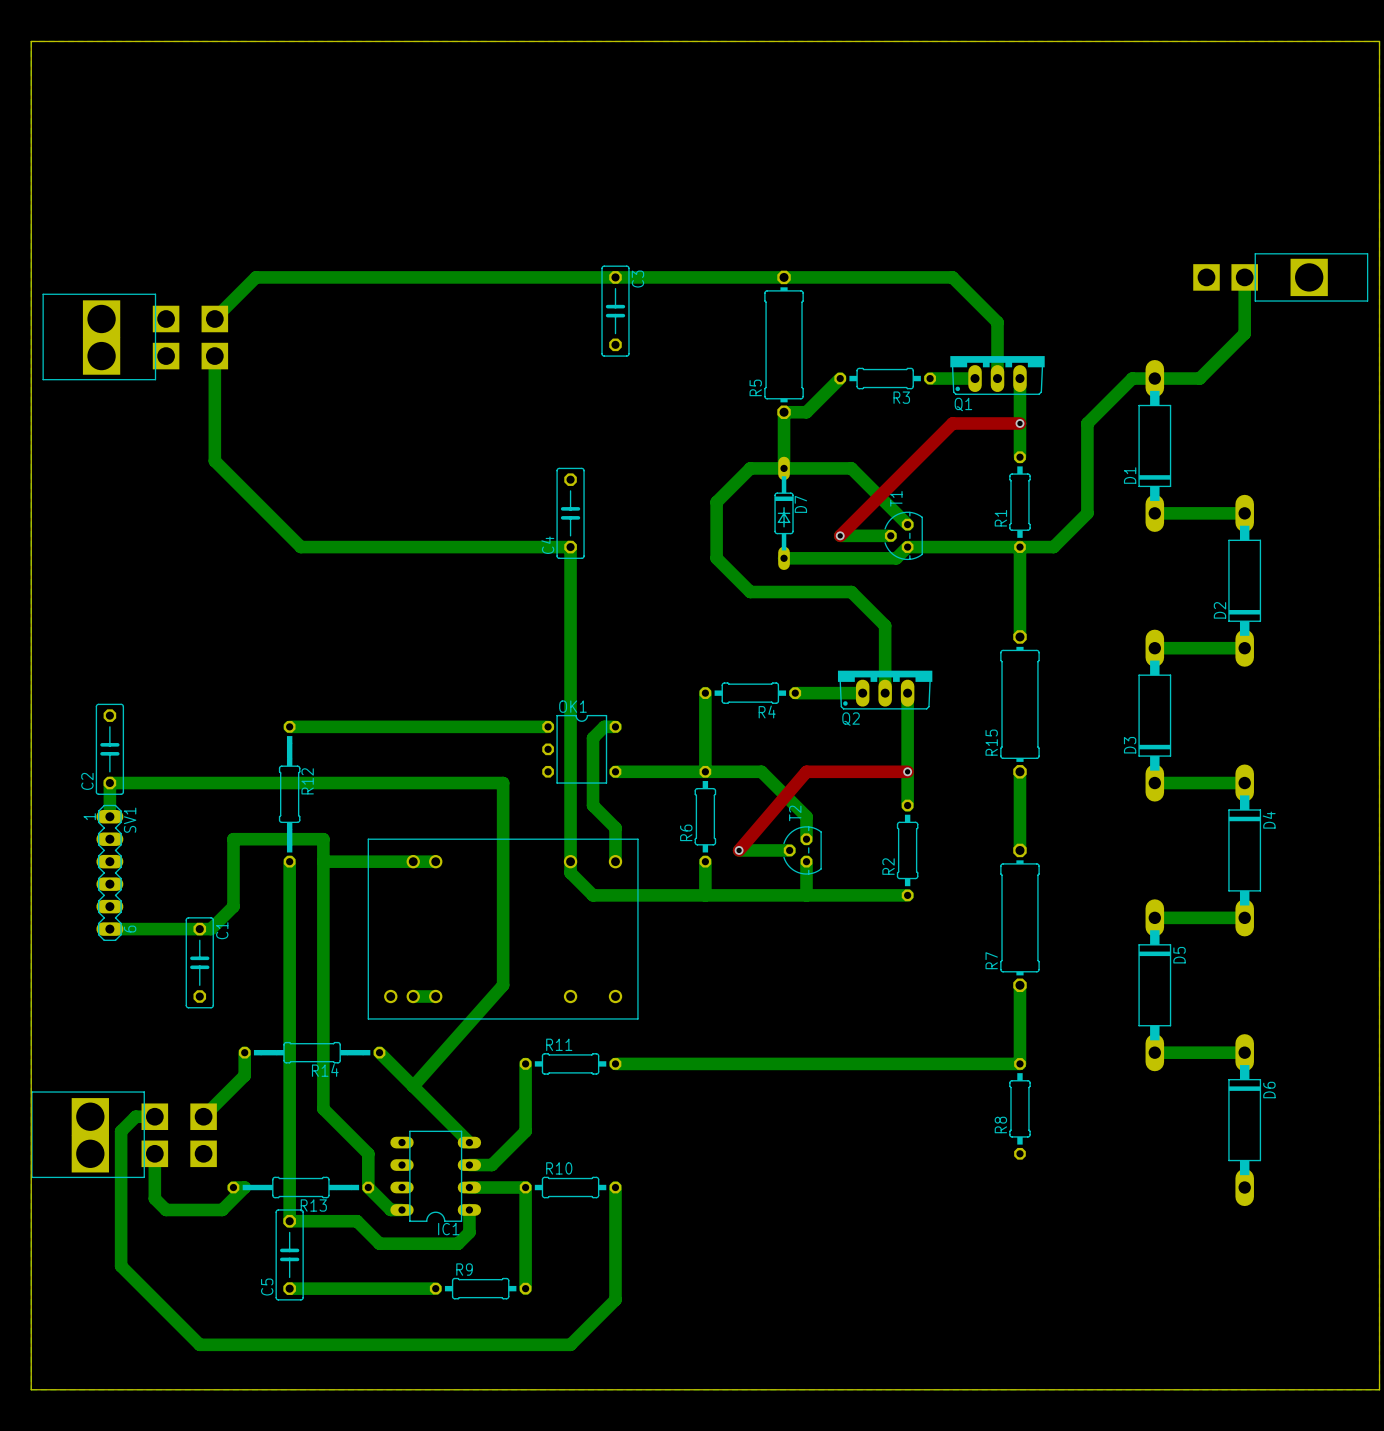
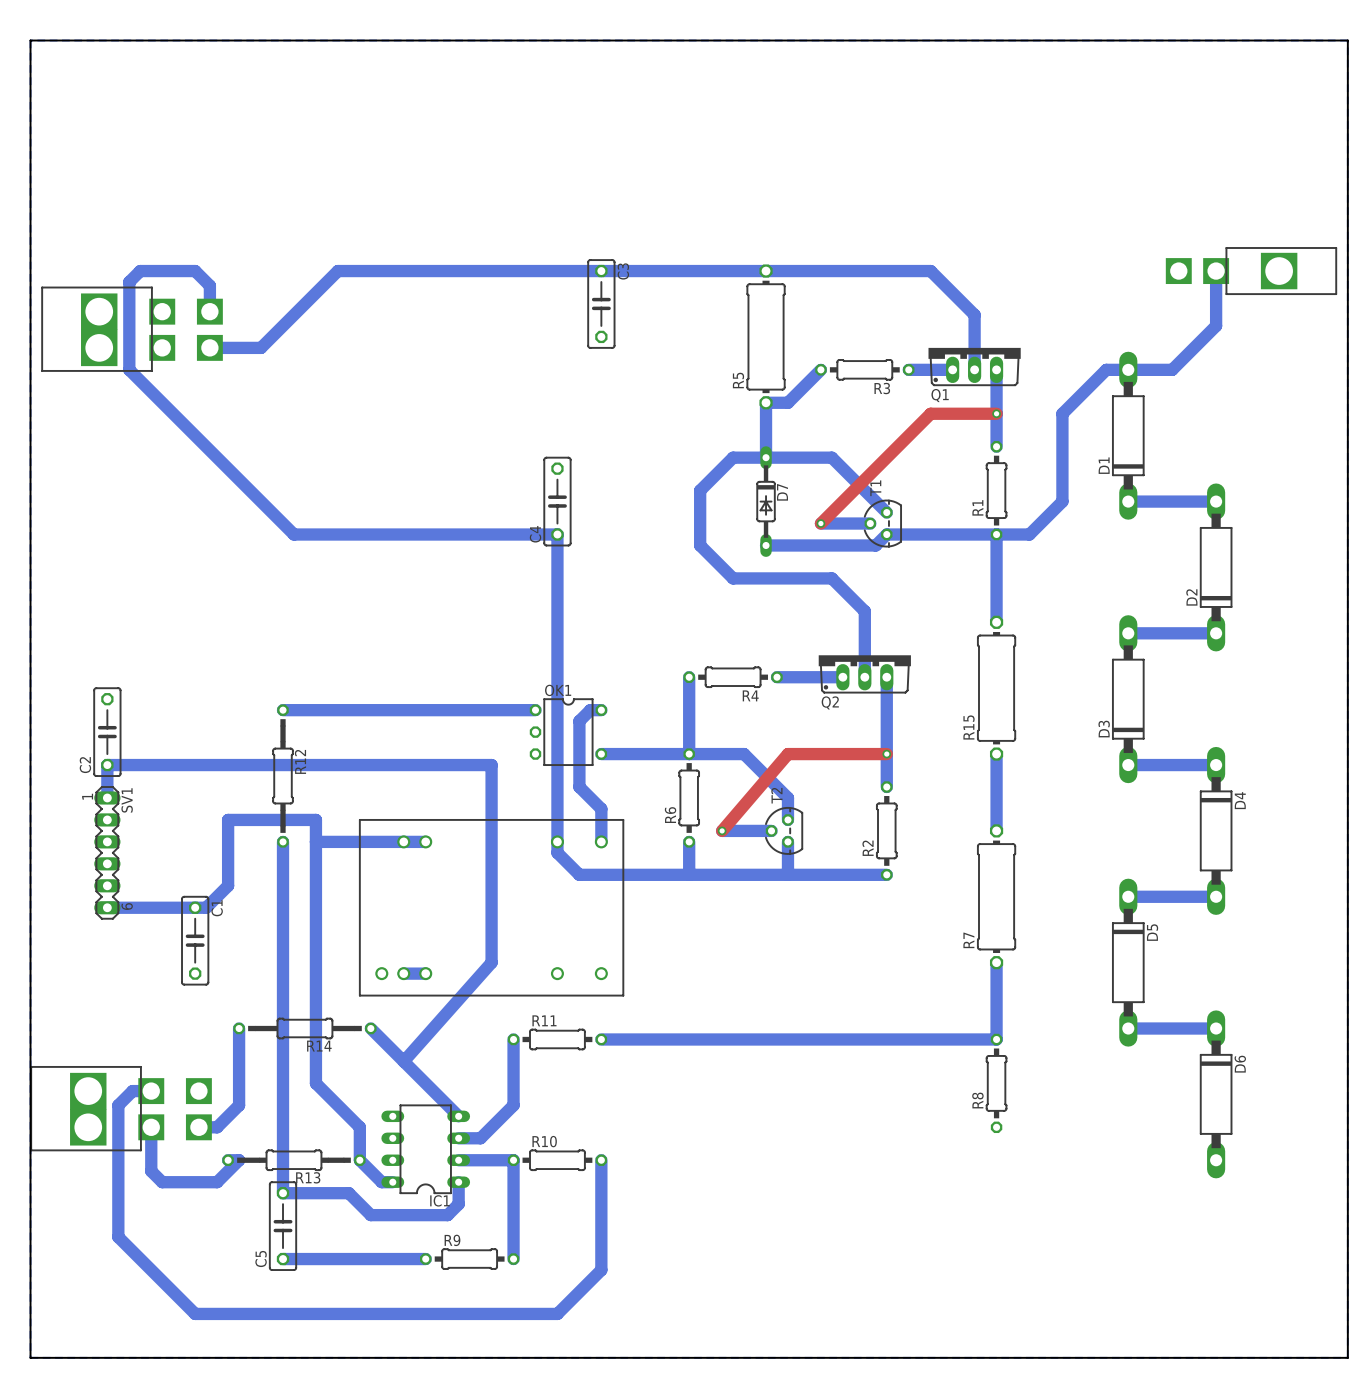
bottom track: (345, 277) (255, 277) (211, 322) -> (337, 271) (261, 347) (206, 347)
bottom track: (214, 356) (214, 461) -> (209, 311) (209, 285) (195, 271) (140, 271) (129, 282) (129, 369) (209, 450)
bottom track: (244, 1075) (203, 1116) -> (239, 1050) (239, 1105) (217, 1127) (198, 1127)

